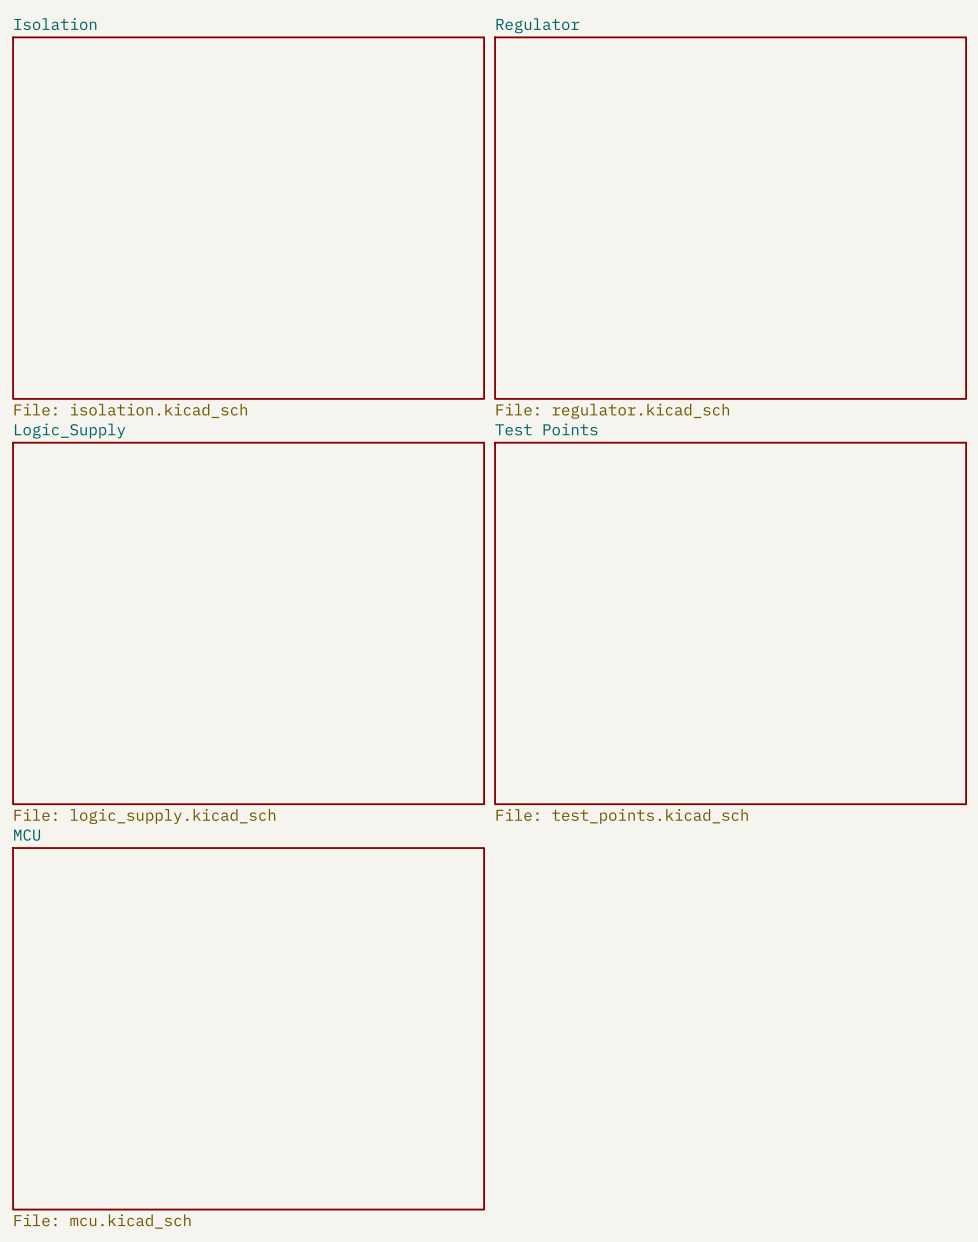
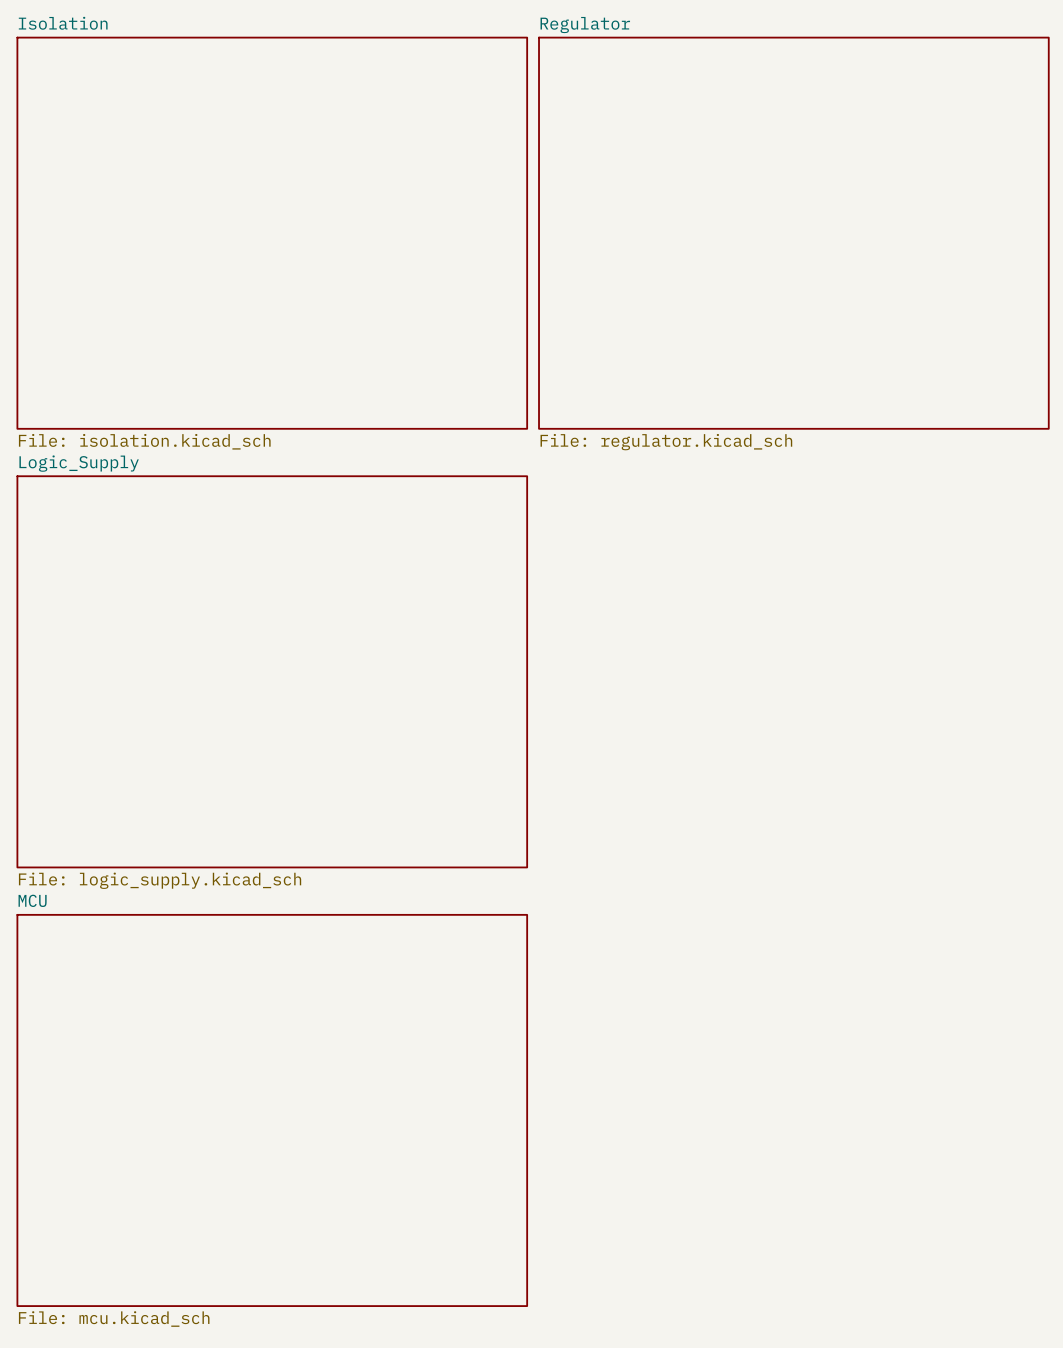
sheet Test Points: File: test_points.kicad_sch (730, 623) -> none

